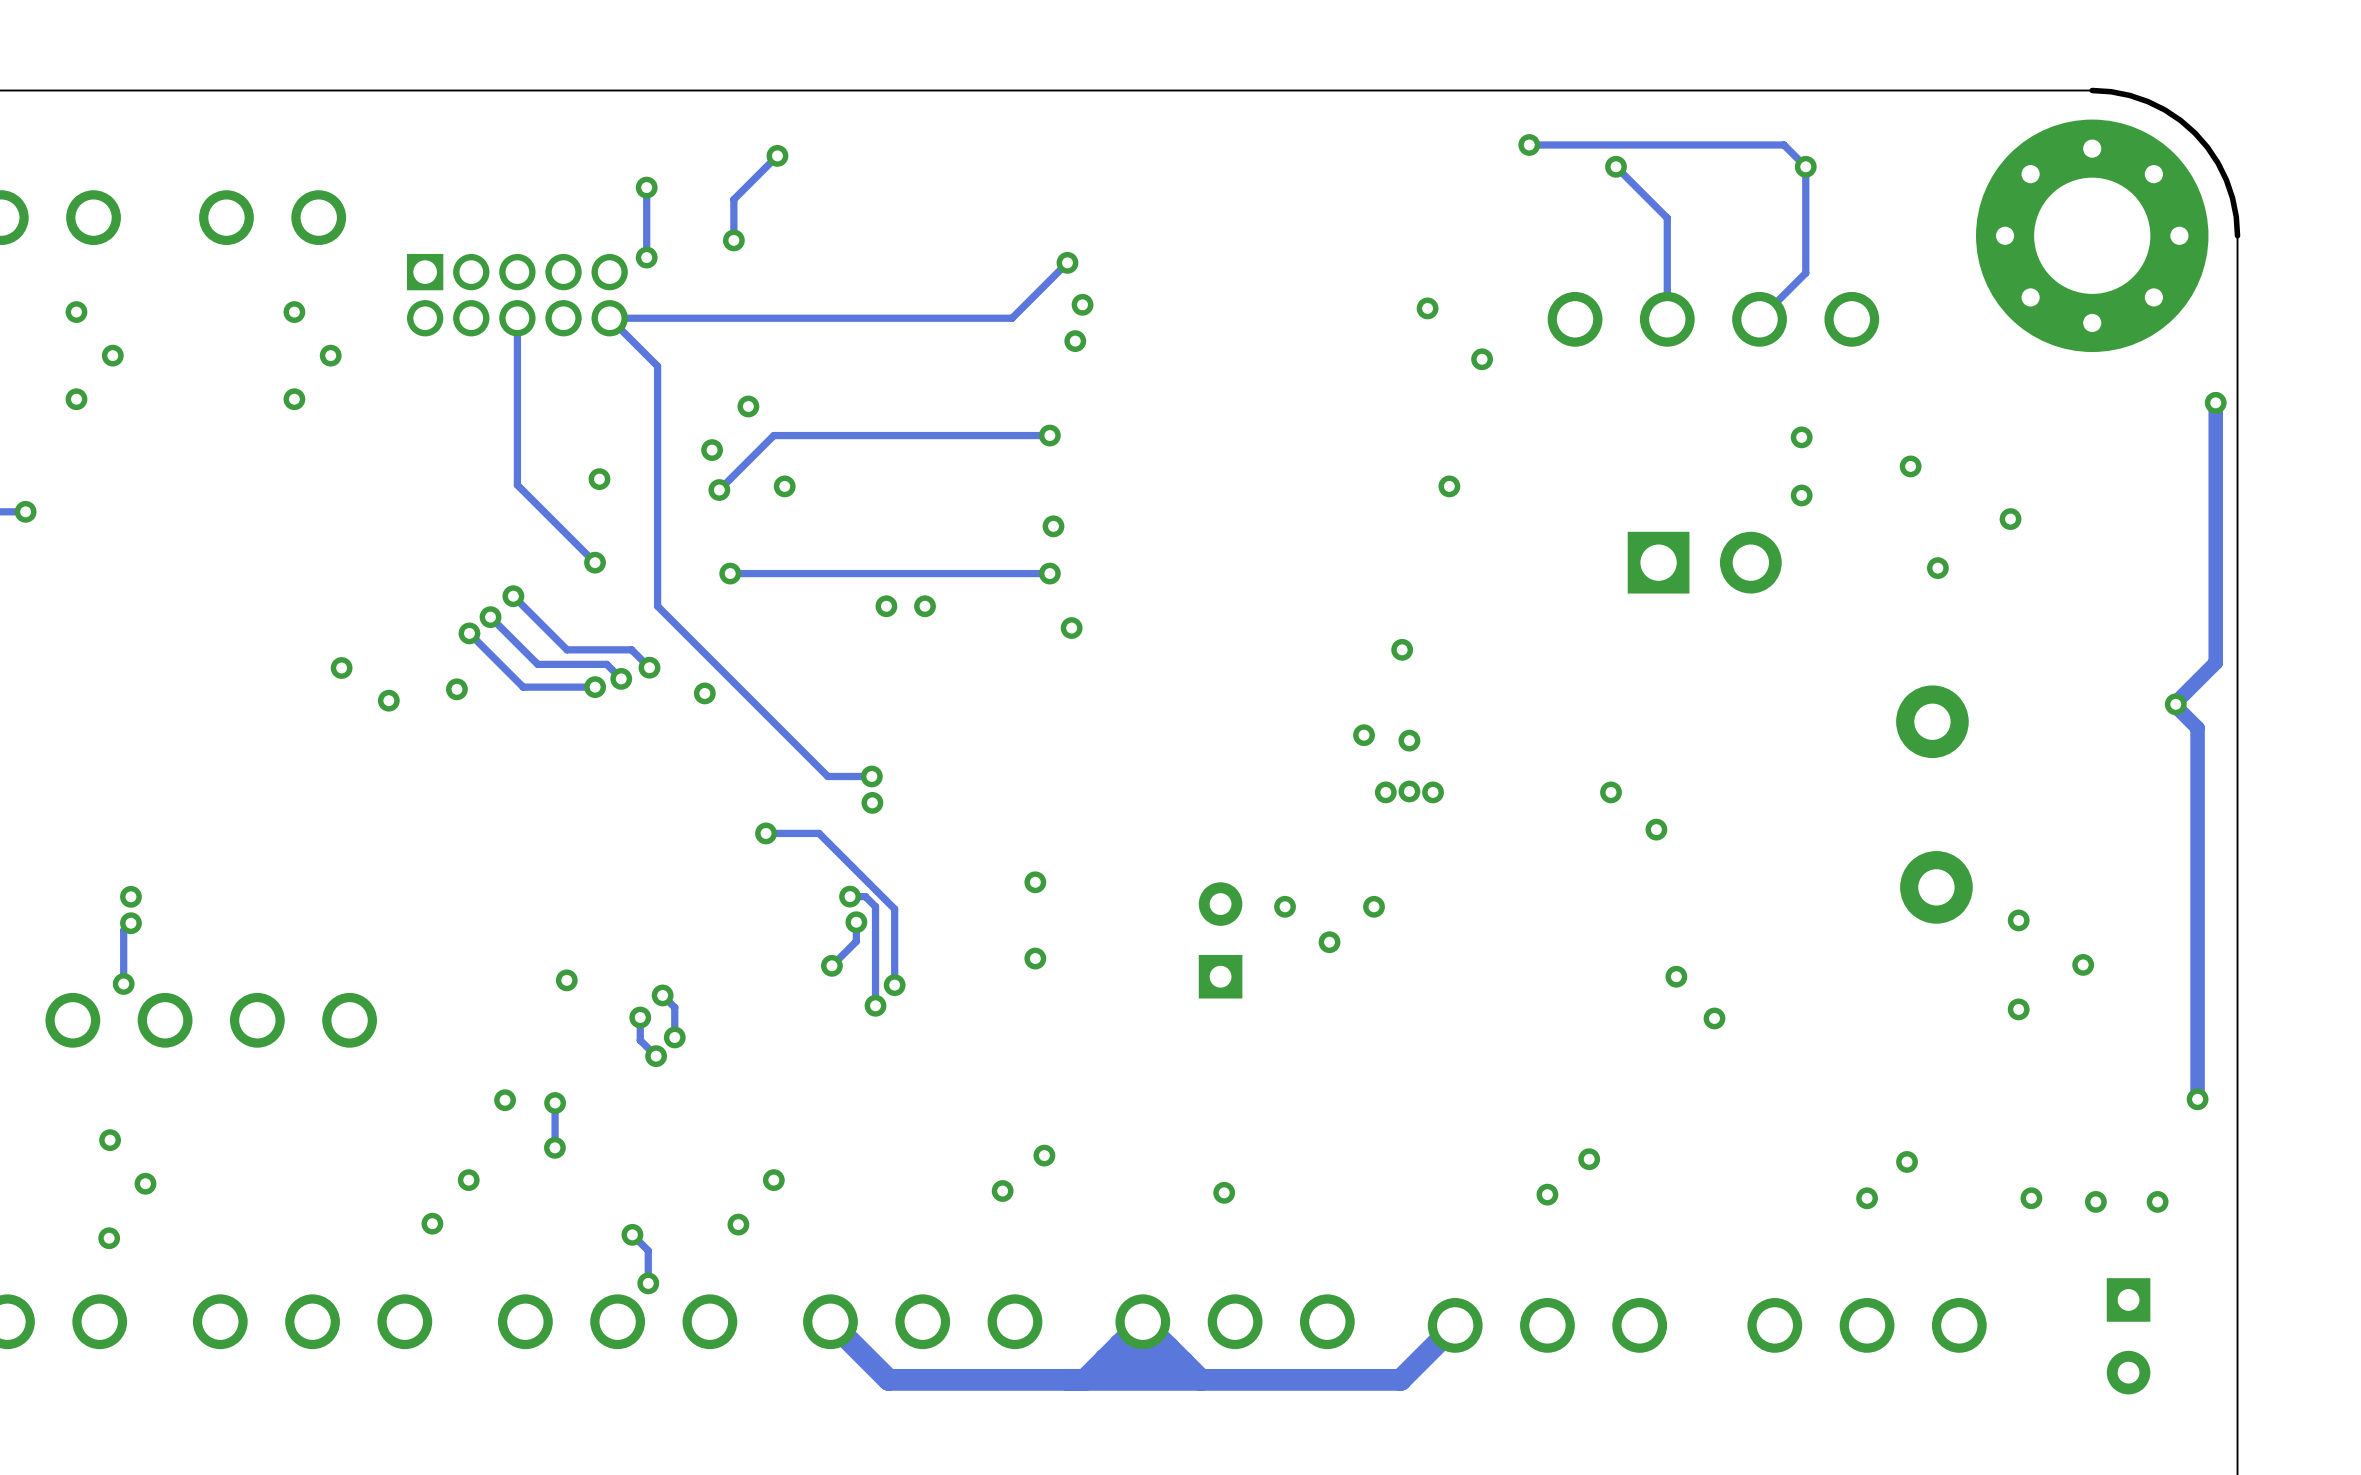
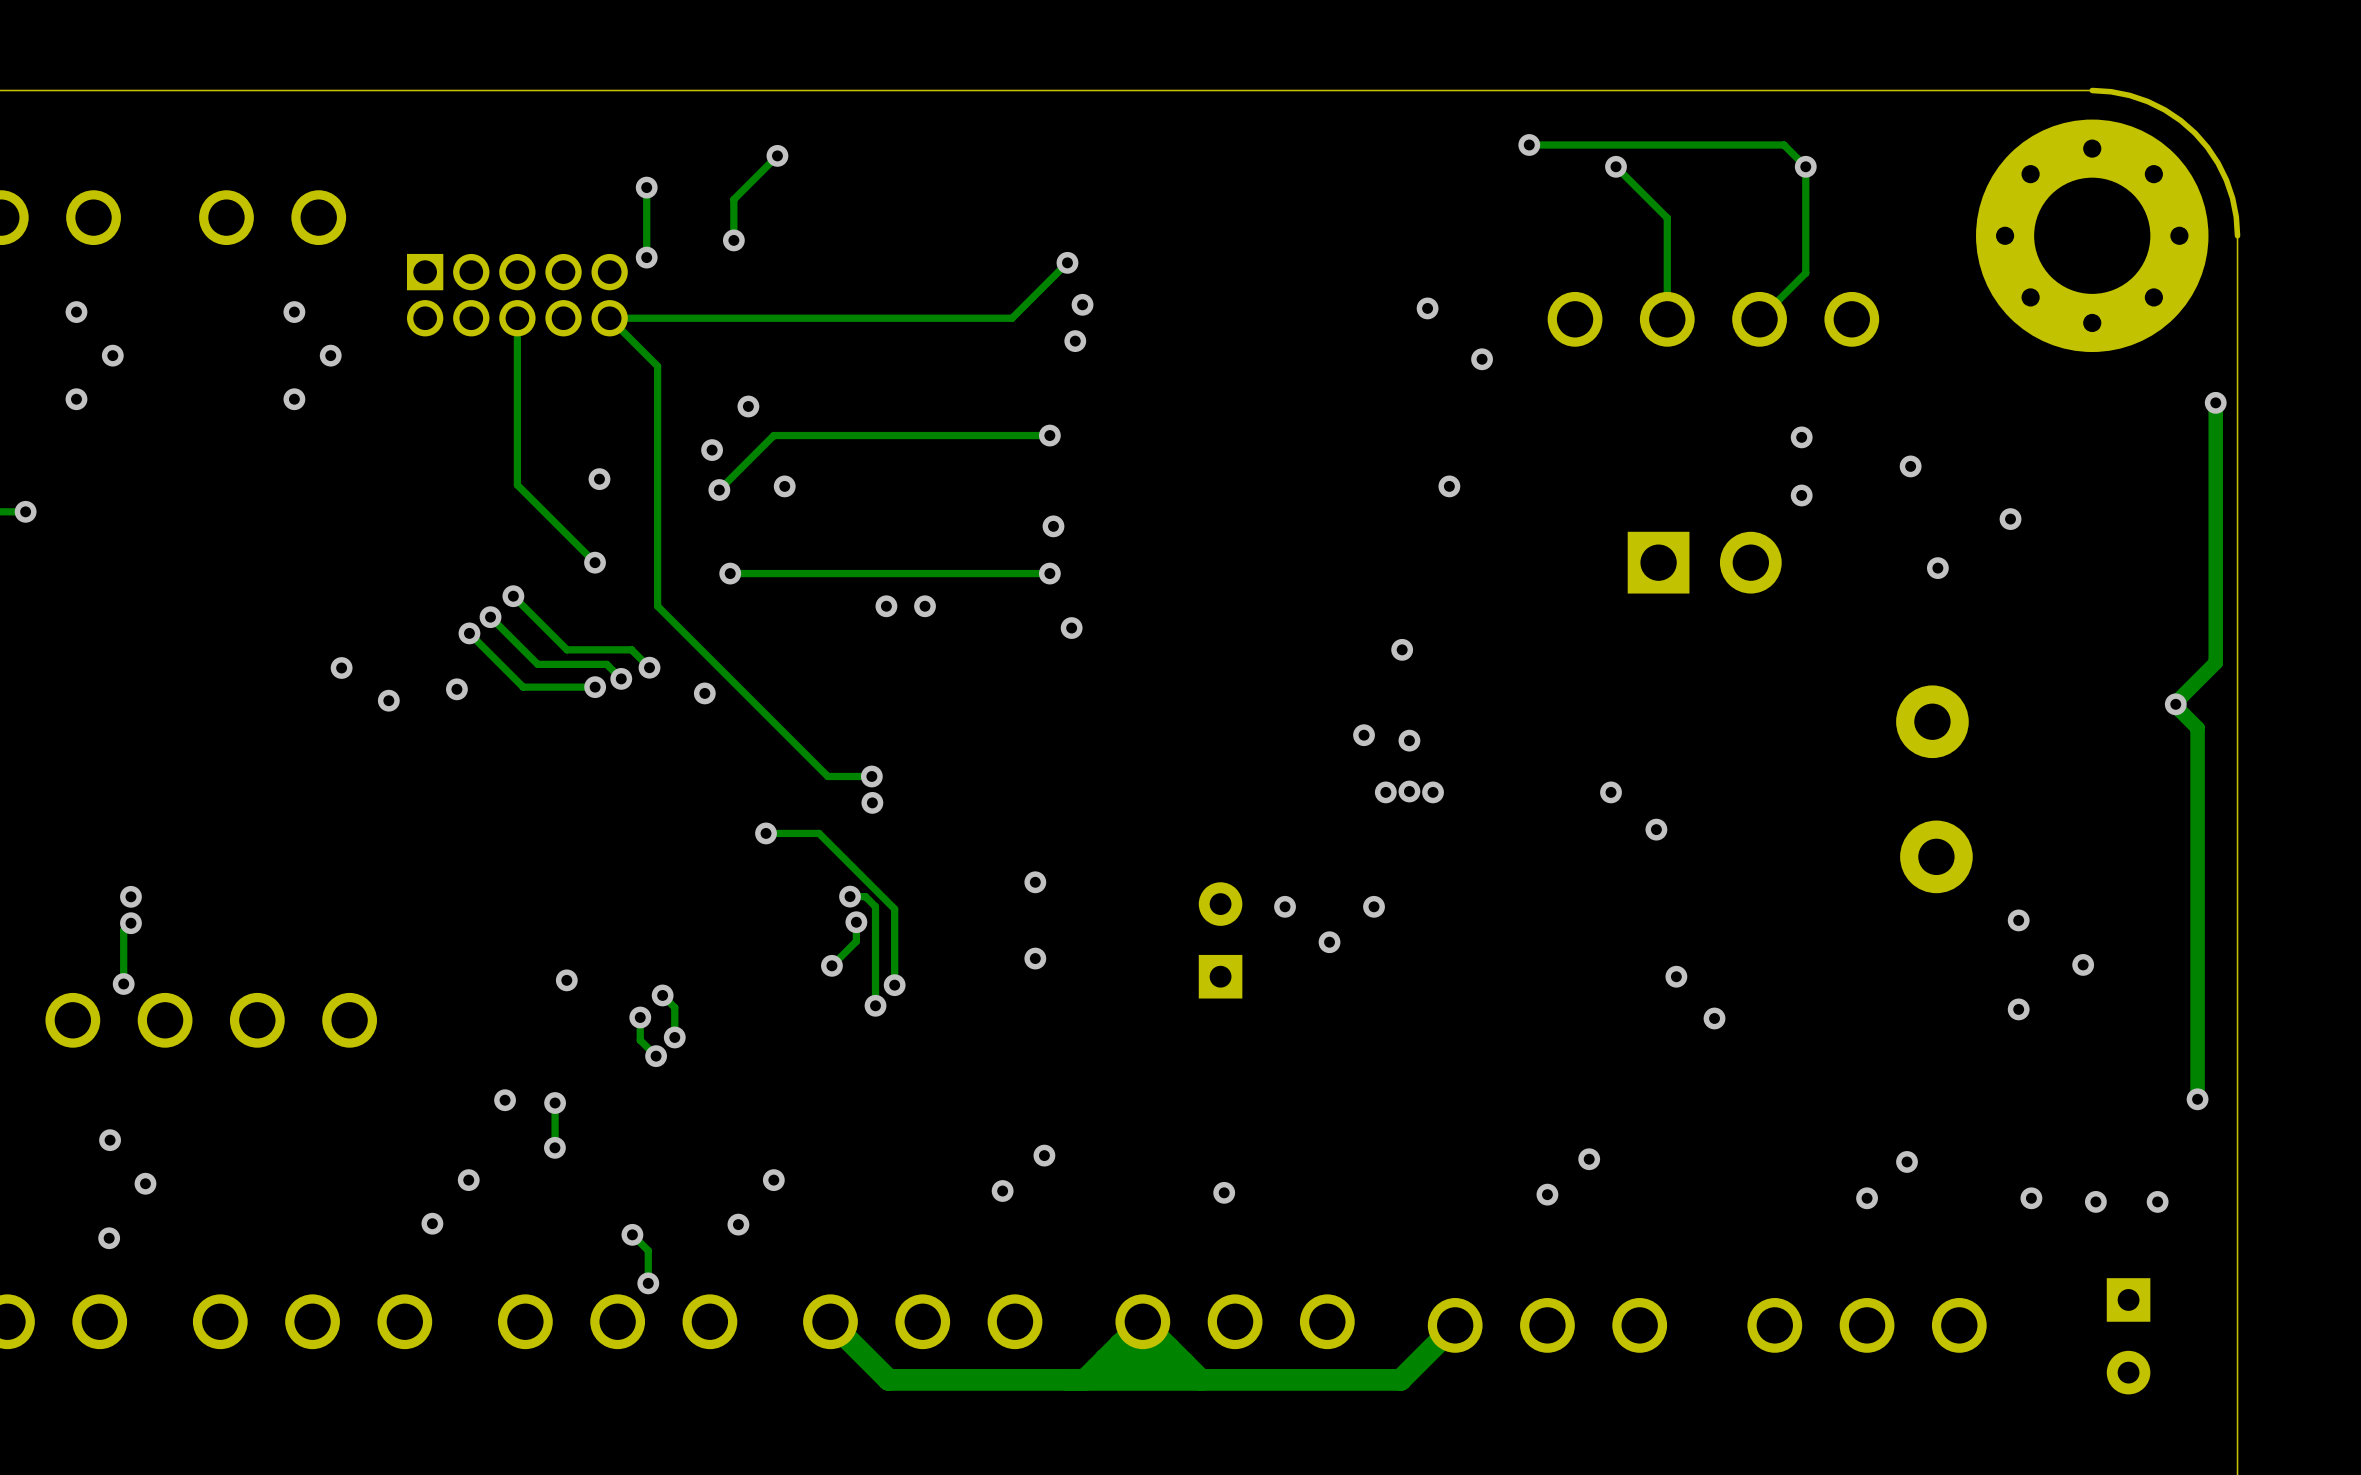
part position: (1936, 887) -> (1936, 856)

